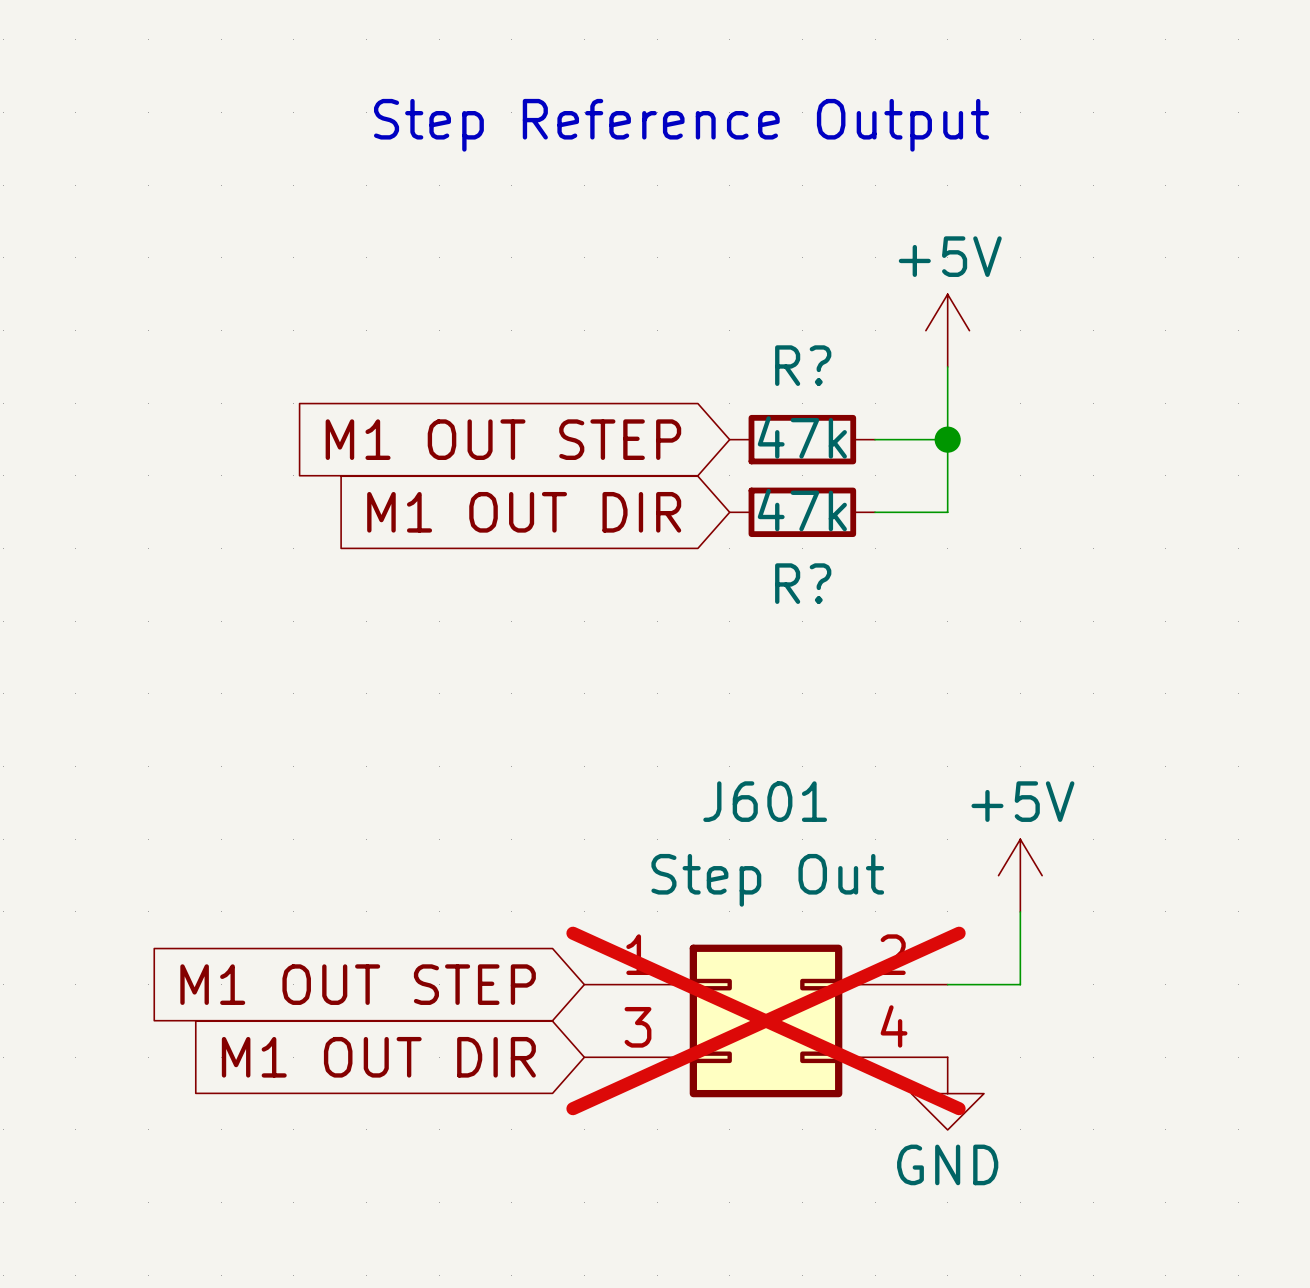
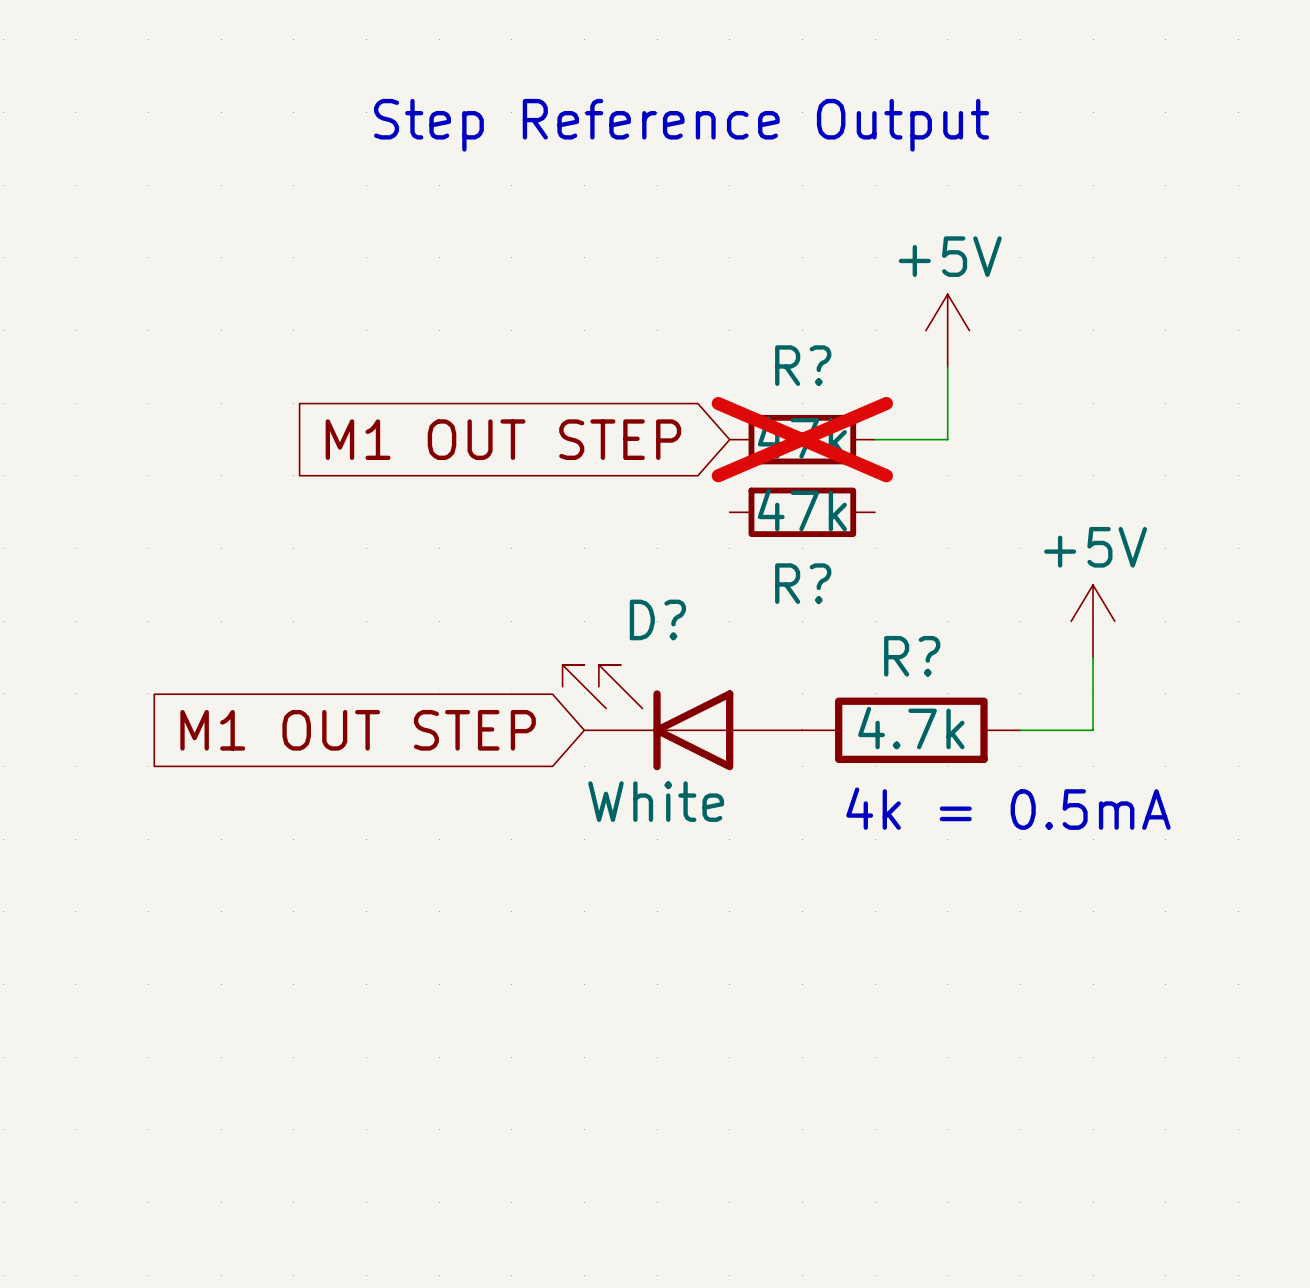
R? do-not-place cross: none -> (802, 439)
wire: (947, 439) (947, 512) (875, 512) -> (1093, 657) (1093, 730) (1020, 730)
junction: (947, 439) -> none
global label: M1 OUT DIR (524, 512) -> none
D?: none -> White (682, 717)
R?: none -> 4.7k (911, 730)
text: none -> 4k = 0.5mA (1008, 808)
power symbol position: +5V (1020, 875) -> +5V (1093, 621)
wire: (1020, 911) (1020, 984) (947, 984) -> none
global label position: M1 OUT STEP (358, 984) -> M1 OUT STEP (358, 730)
J601: Step Out (766, 1020) -> none
global label: M1 OUT DIR (378, 1057) -> none
power symbol: GND (947, 1093) -> none

